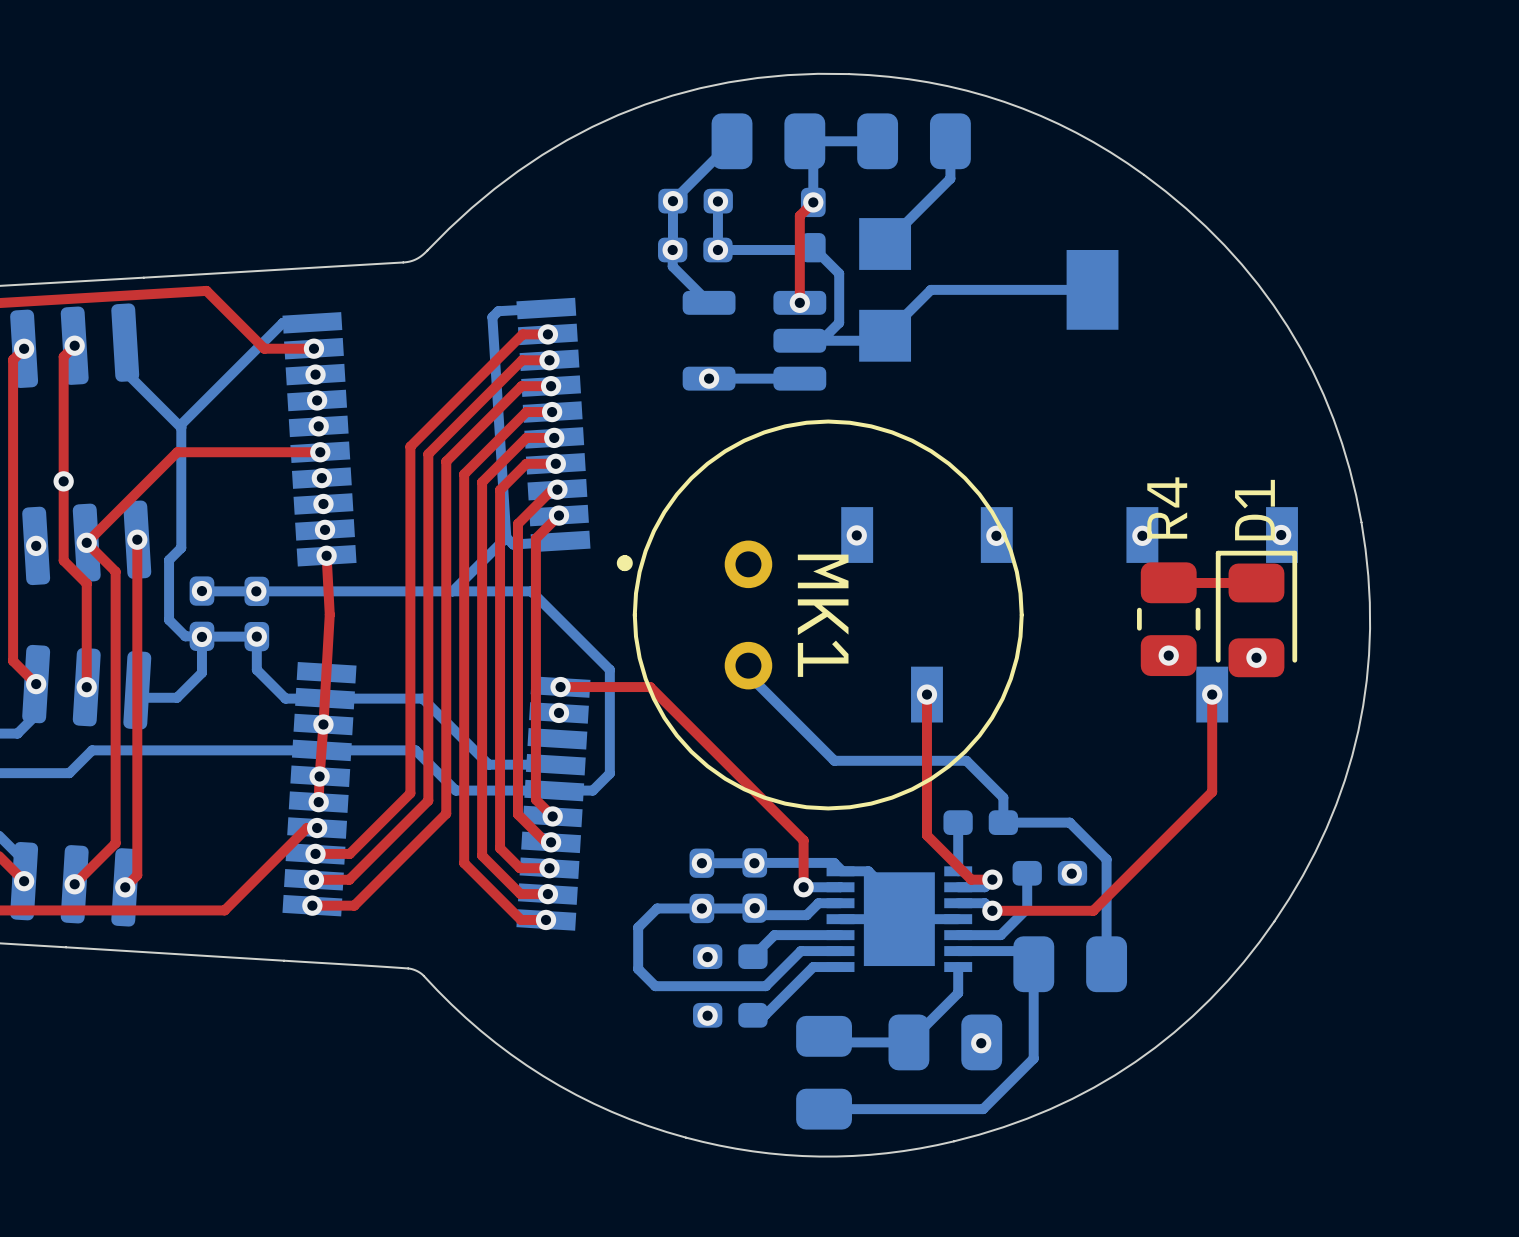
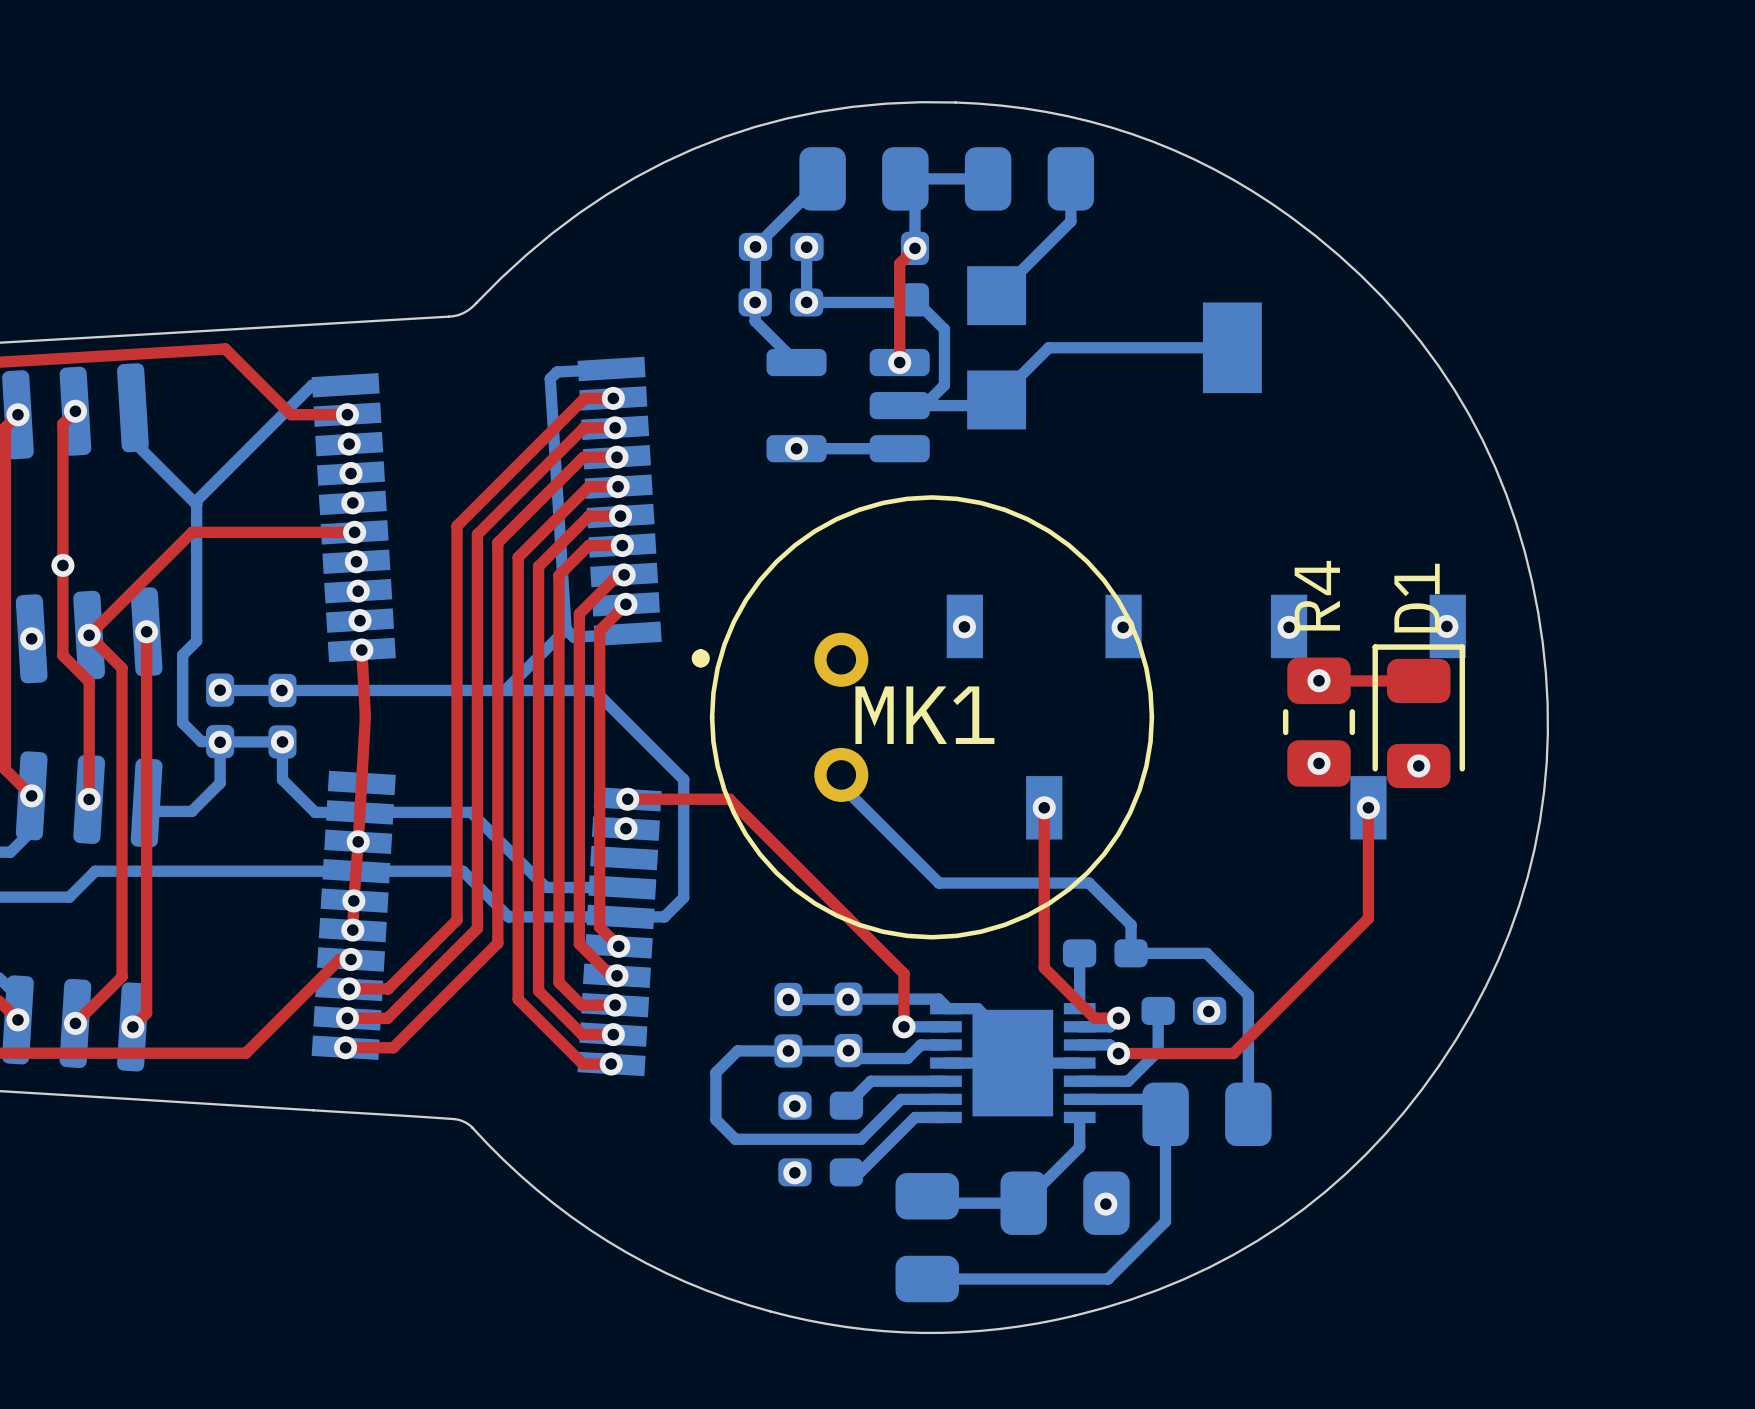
via: none -> (1319, 680)
MK1 name rotation: 0° (823, 615) -> 90° counterclockwise (924, 715)

